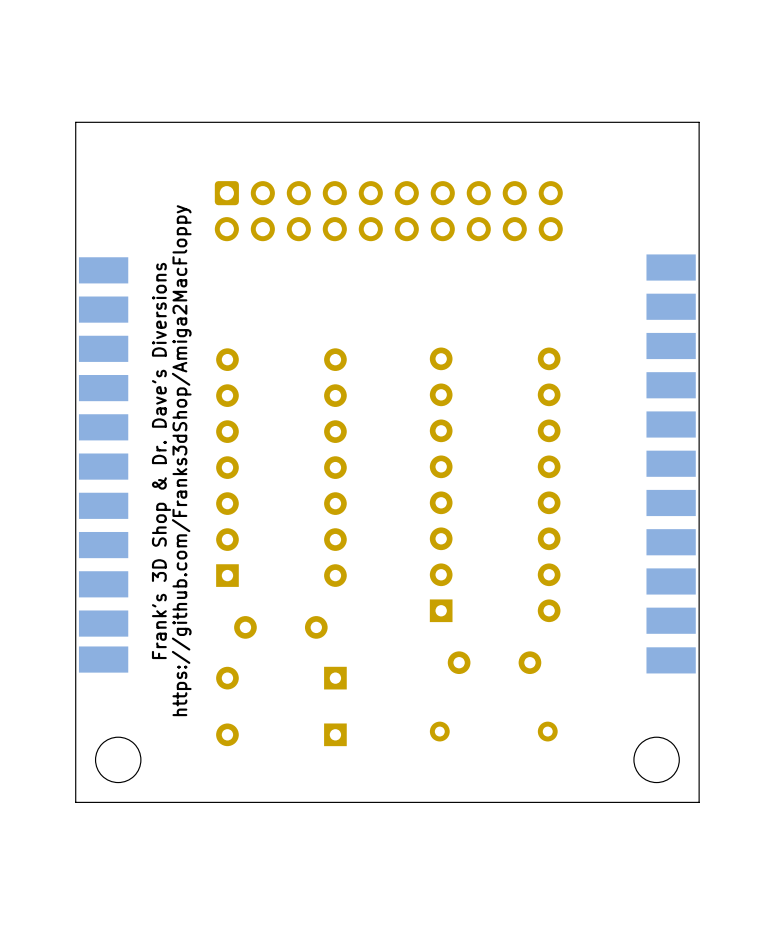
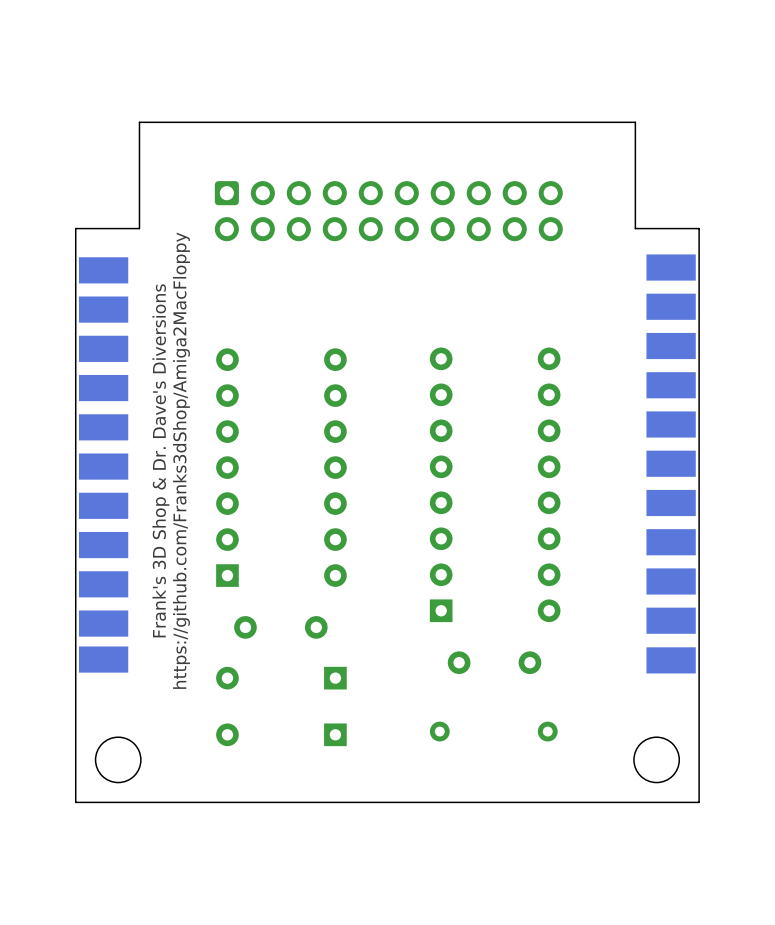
board edge: (139, 122) (75, 122) (75, 228) -> (139, 122) (139, 228) (75, 228)
board edge: (635, 122) (699, 122) (699, 228) -> (635, 122) (635, 228) (699, 228)

